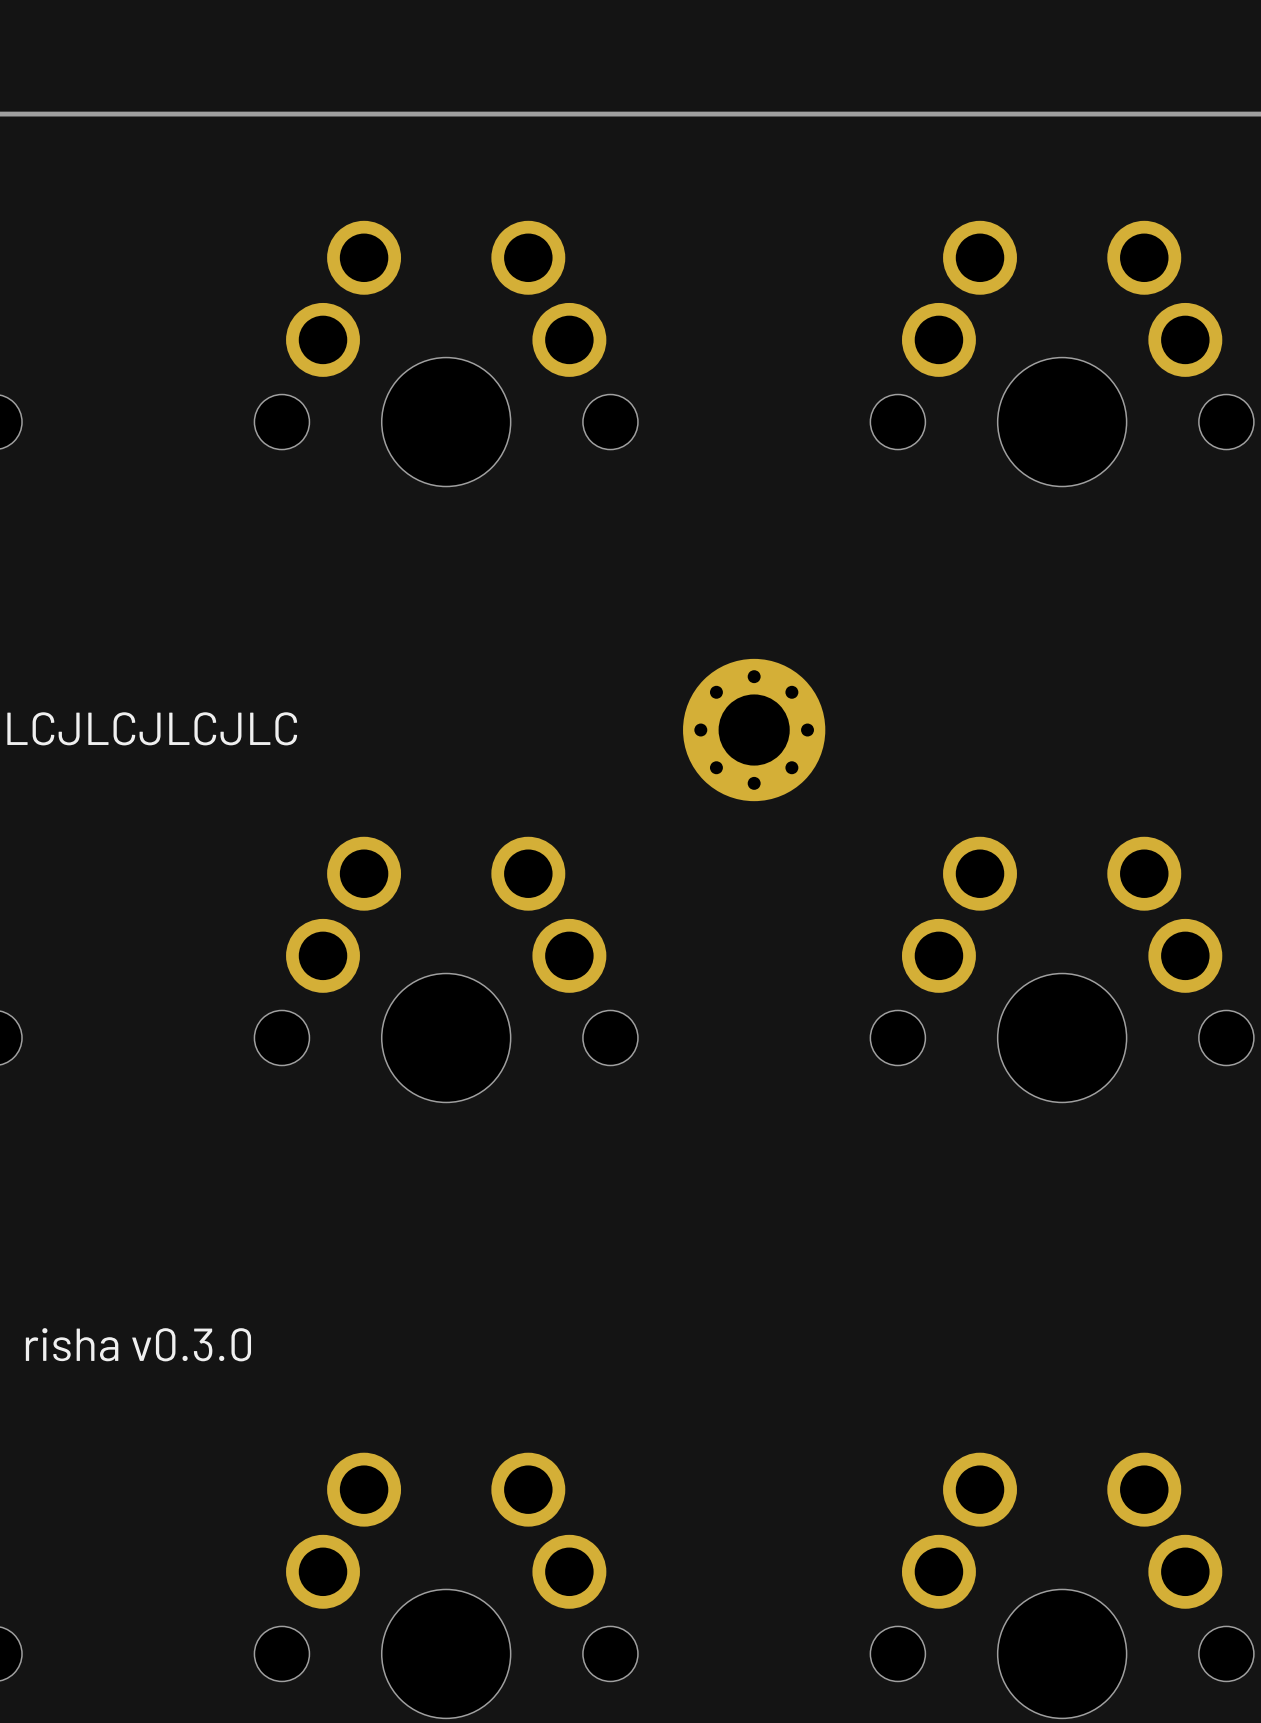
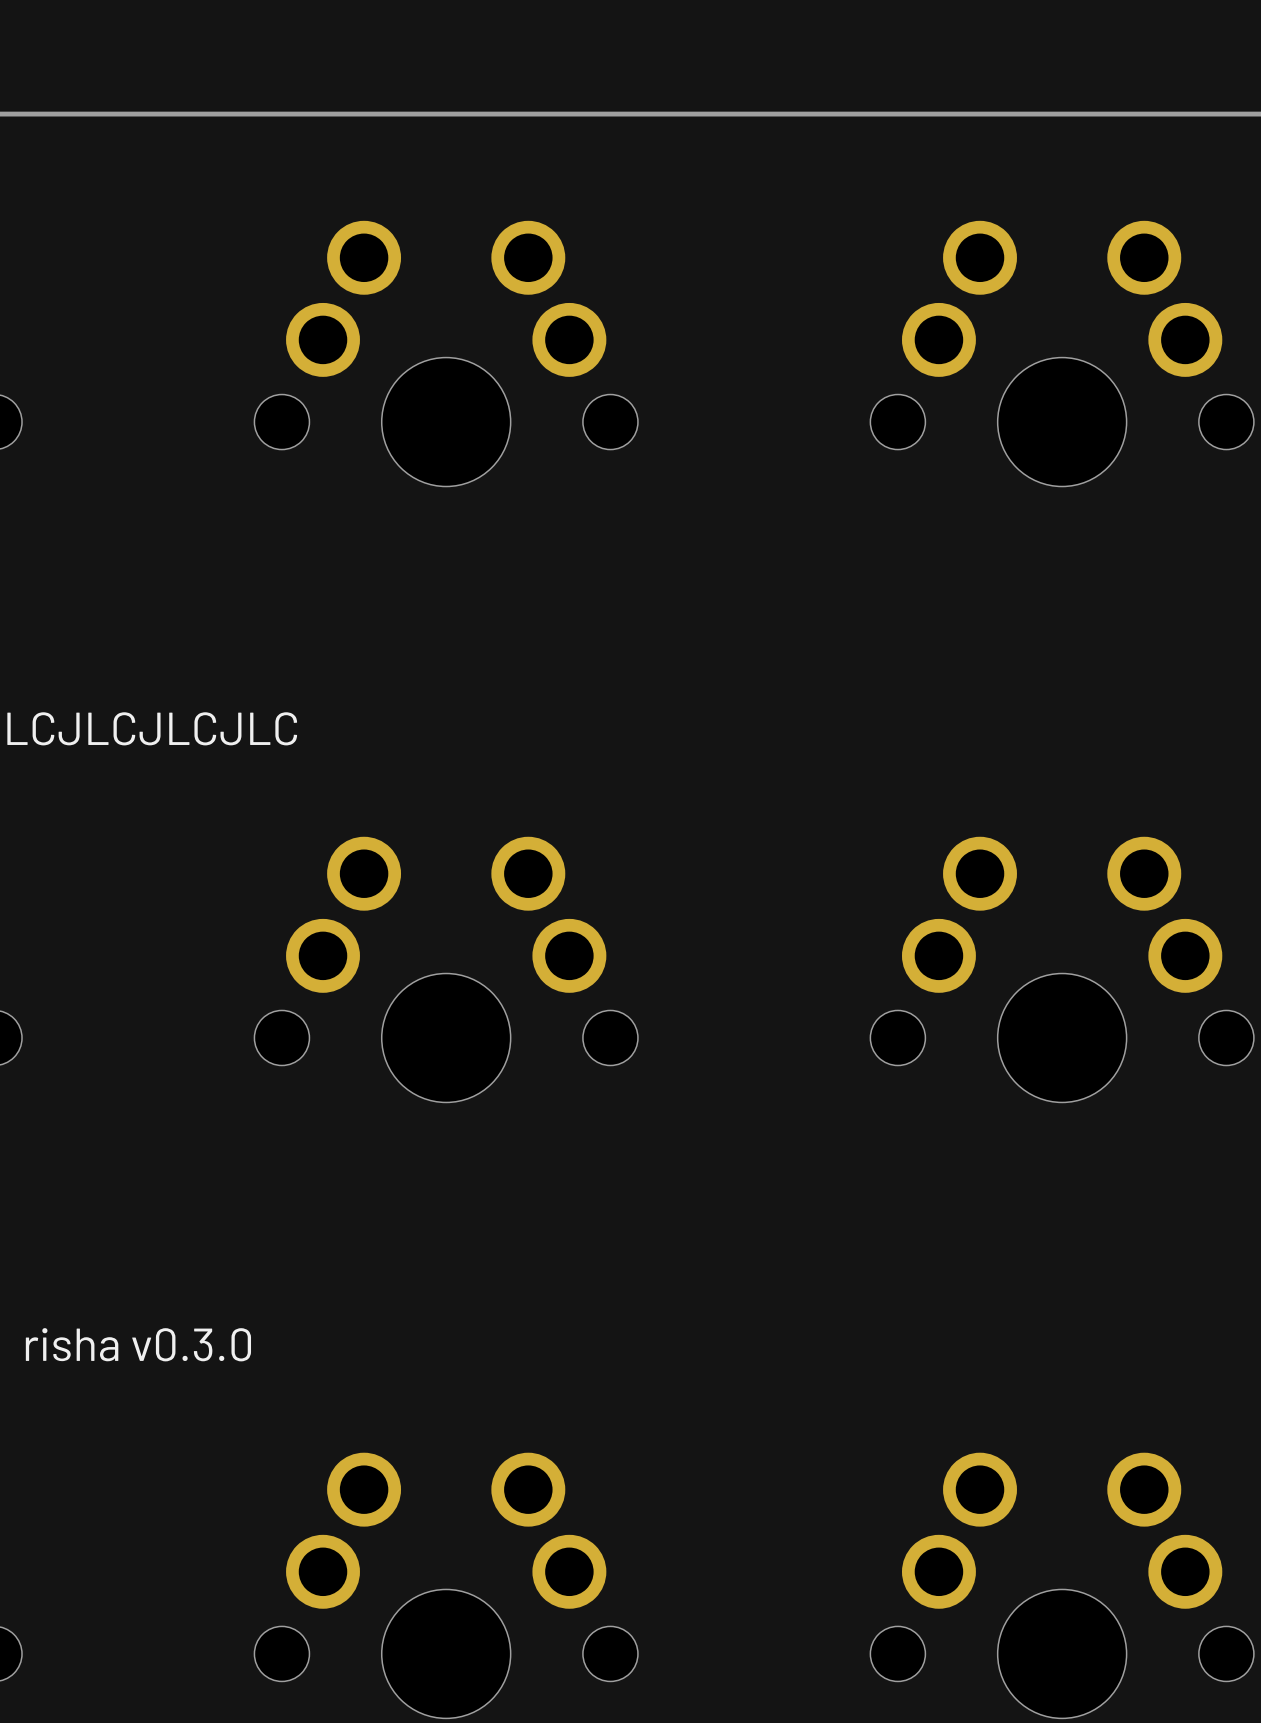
part: (754, 730) -> none

